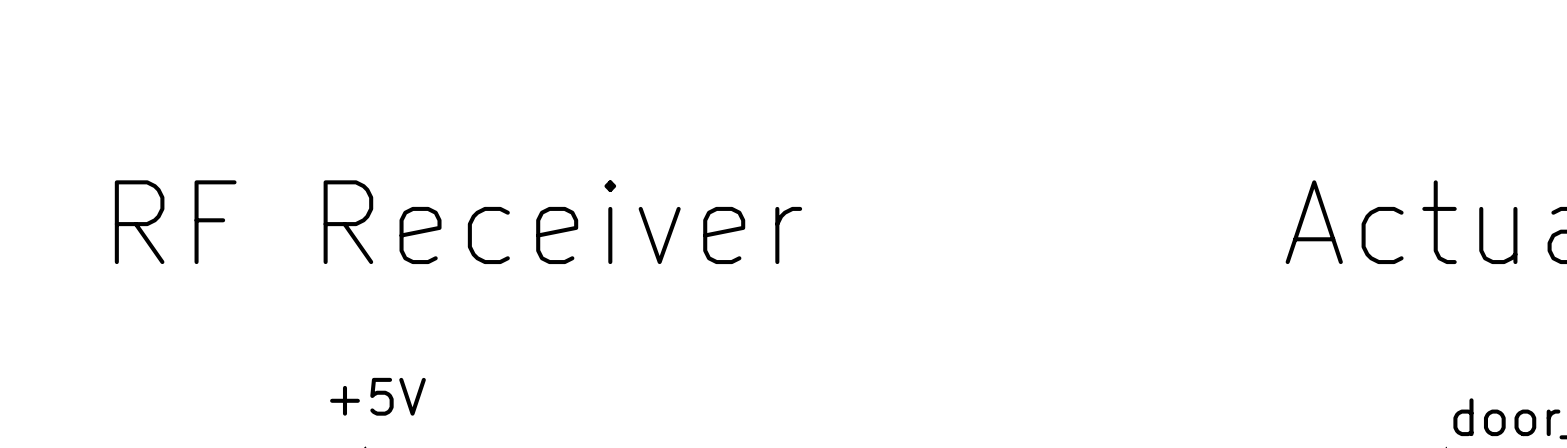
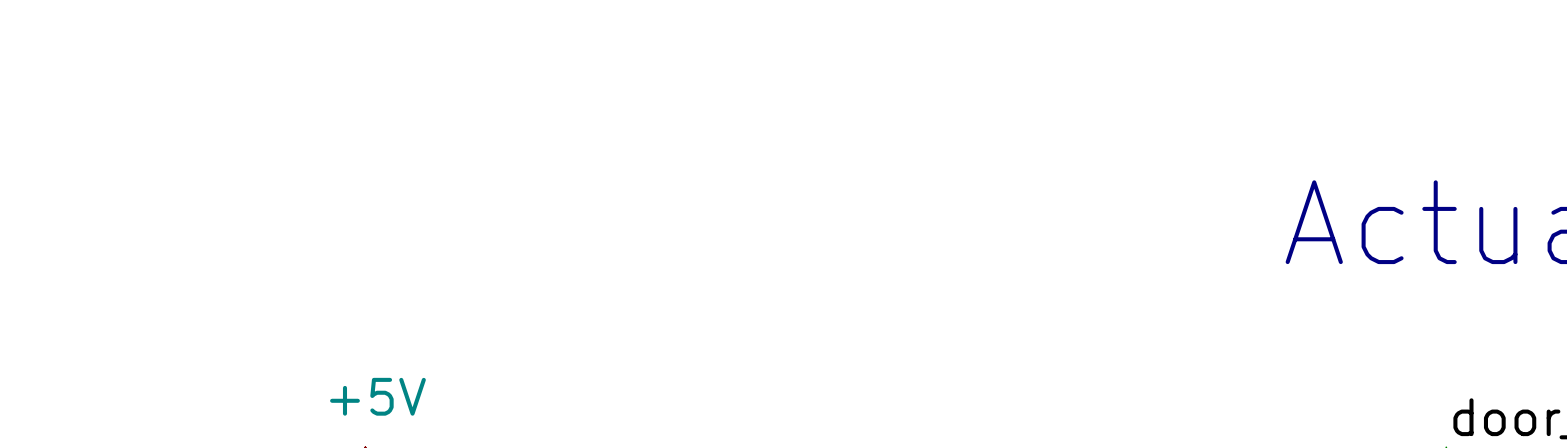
text: RF Receiver (458, 222) -> none

